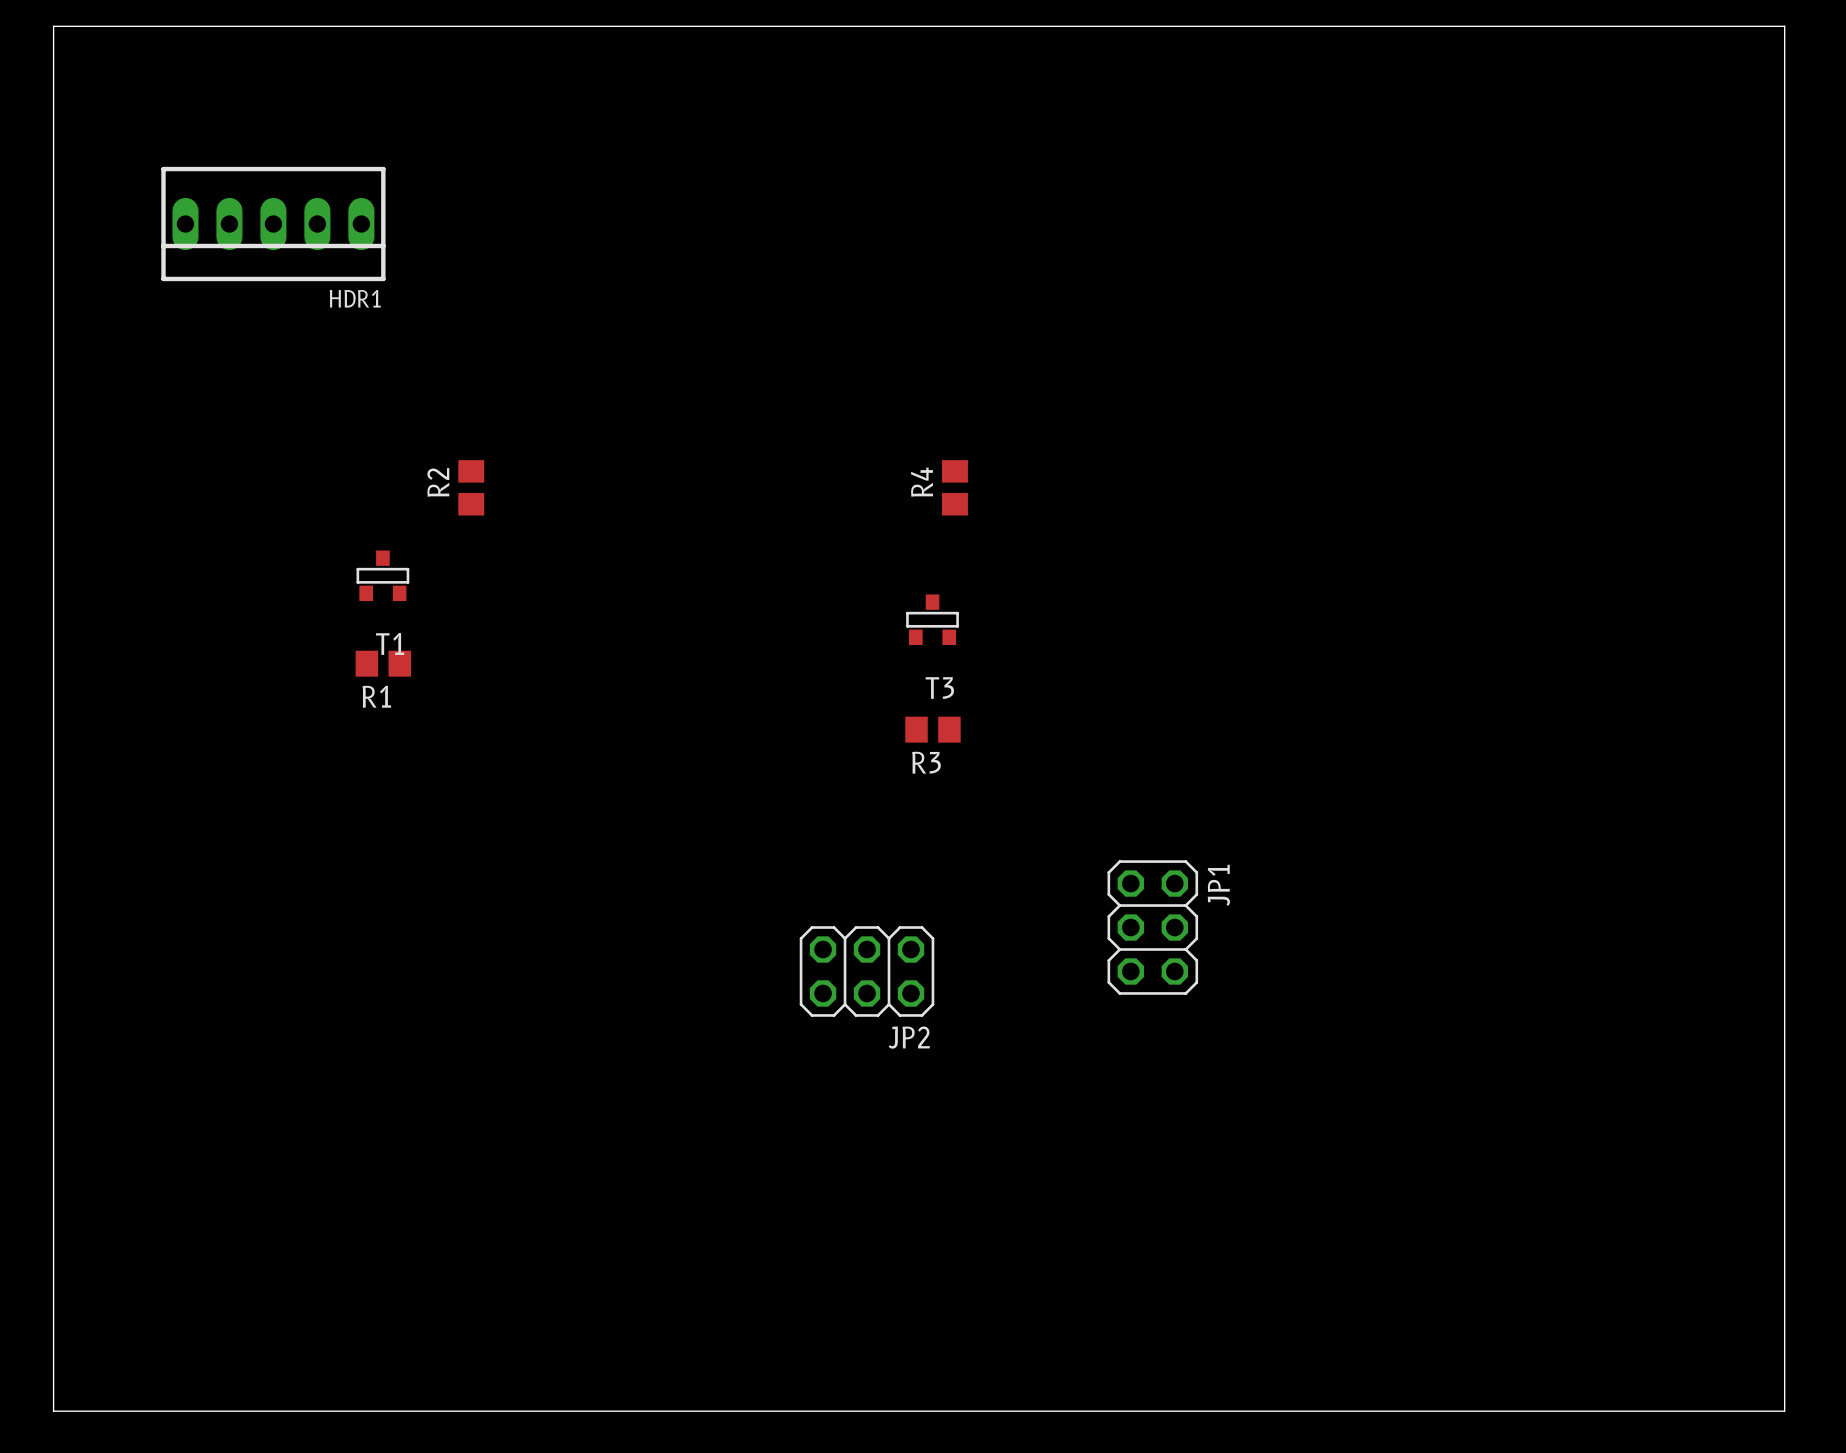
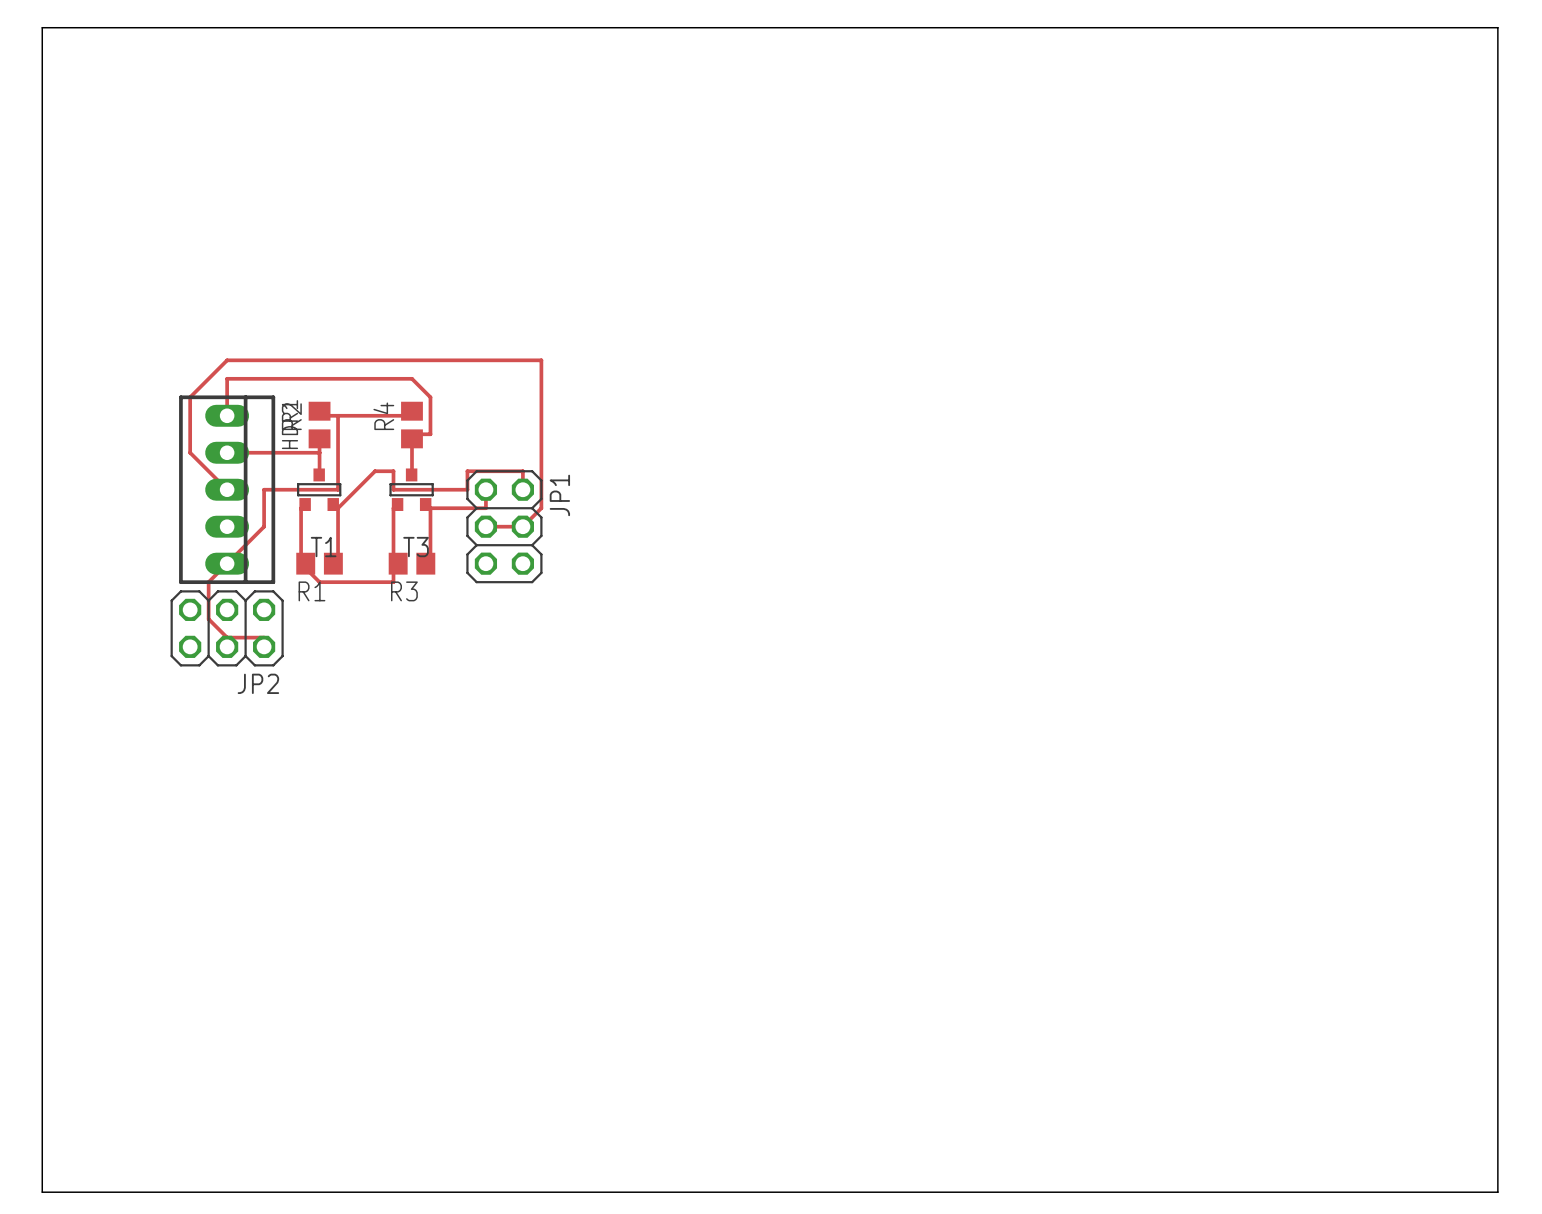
HDR1 rotation: 0° (273, 224) -> 90° counterclockwise (227, 489)
HDR1 position: (273, 224) -> (227, 489)
top track: none -> (319, 411) (319, 415) (411, 415) (411, 411)
top track: none -> (227, 415) (227, 378) (411, 378) (430, 397) (430, 434) (411, 434) (411, 474)
top track: none -> (338, 415) (338, 489) (264, 489) (264, 526) (208, 582) (208, 619) (227, 637)
R2 position: (471, 487) -> (319, 425)
R4 position: (954, 487) -> (411, 425)
top track: none -> (319, 434) (319, 474)
top track: none -> (227, 452) (319, 452)
top track: none -> (227, 489) (190, 452) (190, 397) (227, 360) (541, 360) (541, 508) (522, 526) (485, 526)
top track: none -> (485, 489) (485, 508) (430, 508)
top track: none -> (522, 489) (522, 471) (467, 471) (467, 489) (393, 489) (393, 471) (375, 471) (338, 508)
top track: none -> (305, 504) (301, 508) (301, 563)
top track: none -> (397, 504) (393, 508) (393, 582) (319, 582) (301, 563)
top track: none -> (338, 508) (338, 563) (333, 563)
top track: none -> (430, 508) (430, 563) (425, 563)
T3 position: (932, 619) -> (411, 489)
R3 position: (932, 729) -> (411, 563)
top track: none -> (227, 637) (264, 637) (264, 646)
JP1 position: (1152, 927) -> (504, 526)
JP2 position: (867, 971) -> (227, 628)

